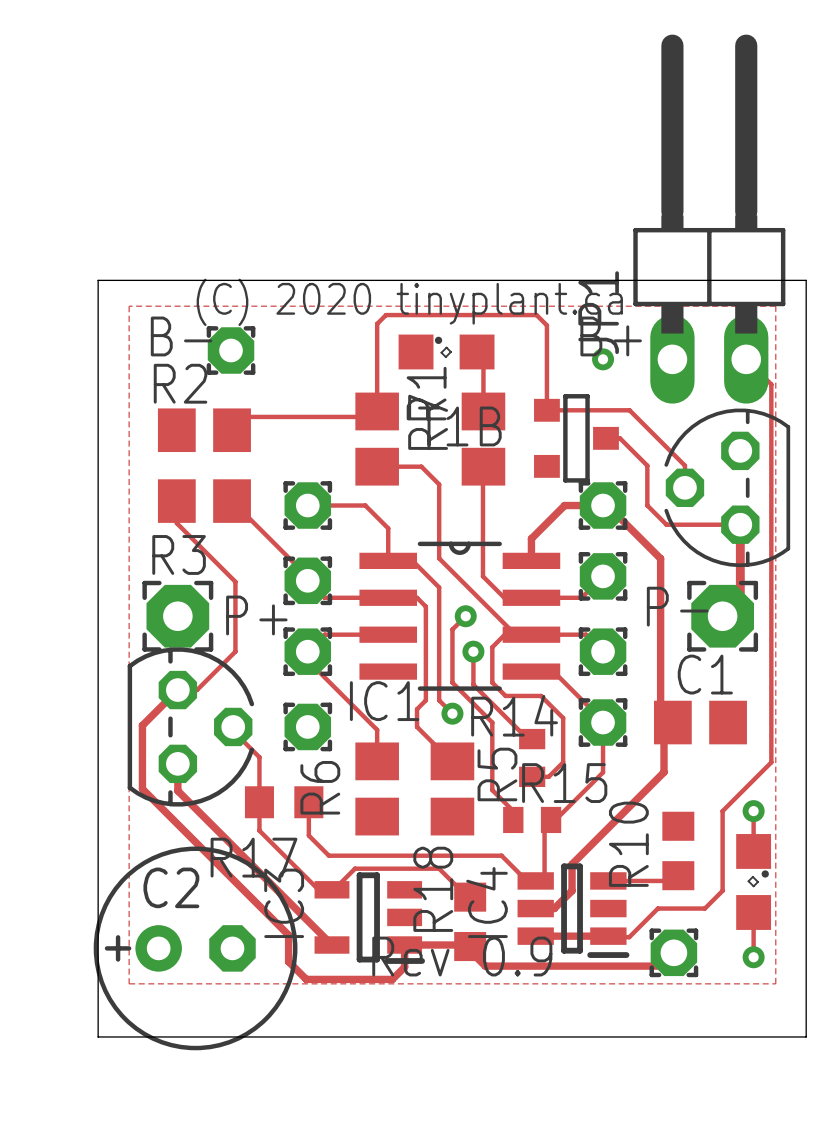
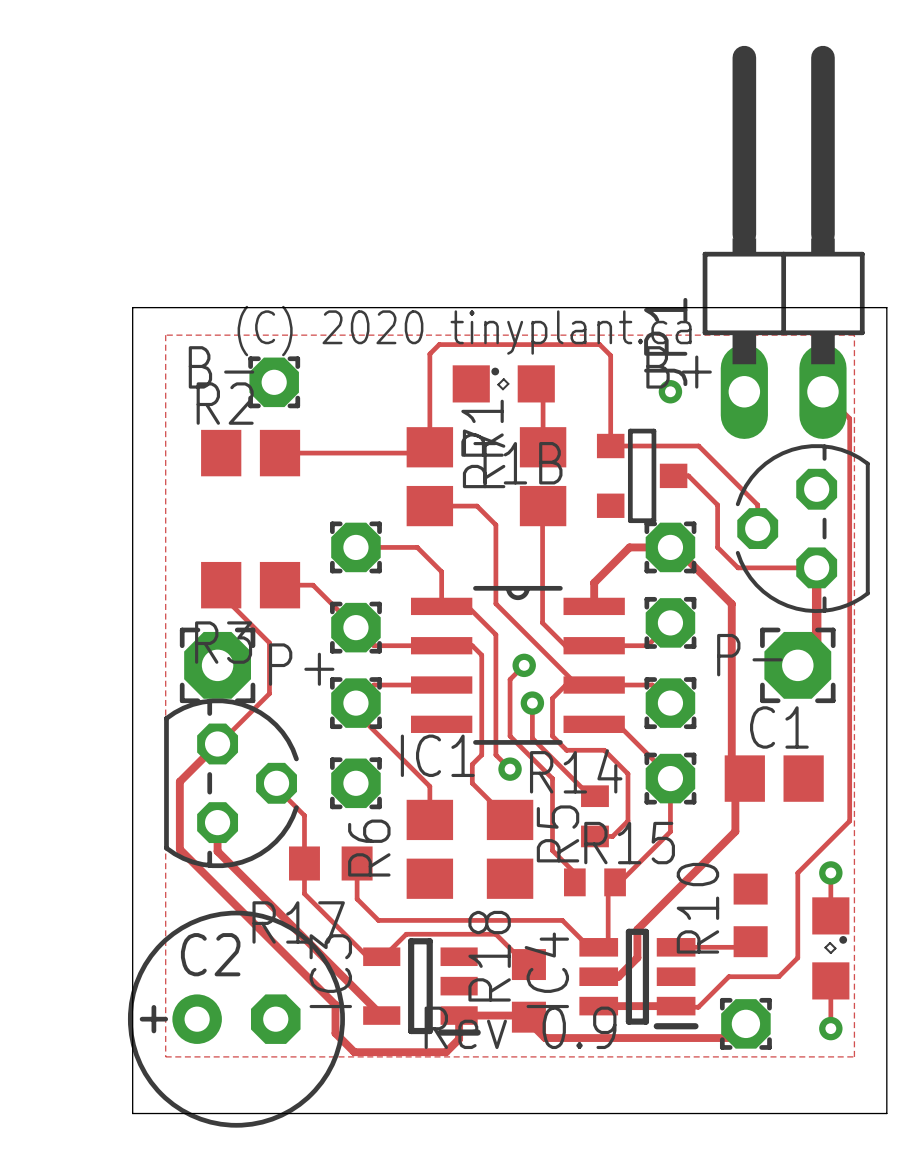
R2 position: (204, 430) -> (250, 453)
track: (176, 501) (176, 523) (235, 581) (235, 651) (197, 690) (179, 690) -> (221, 585) (230, 594) (230, 604) (269, 642) (269, 693) (219, 743)
R3 position: (204, 501) -> (250, 585)
track: (232, 501) (307, 576) (307, 580) -> (280, 585) (313, 585) (355, 627)

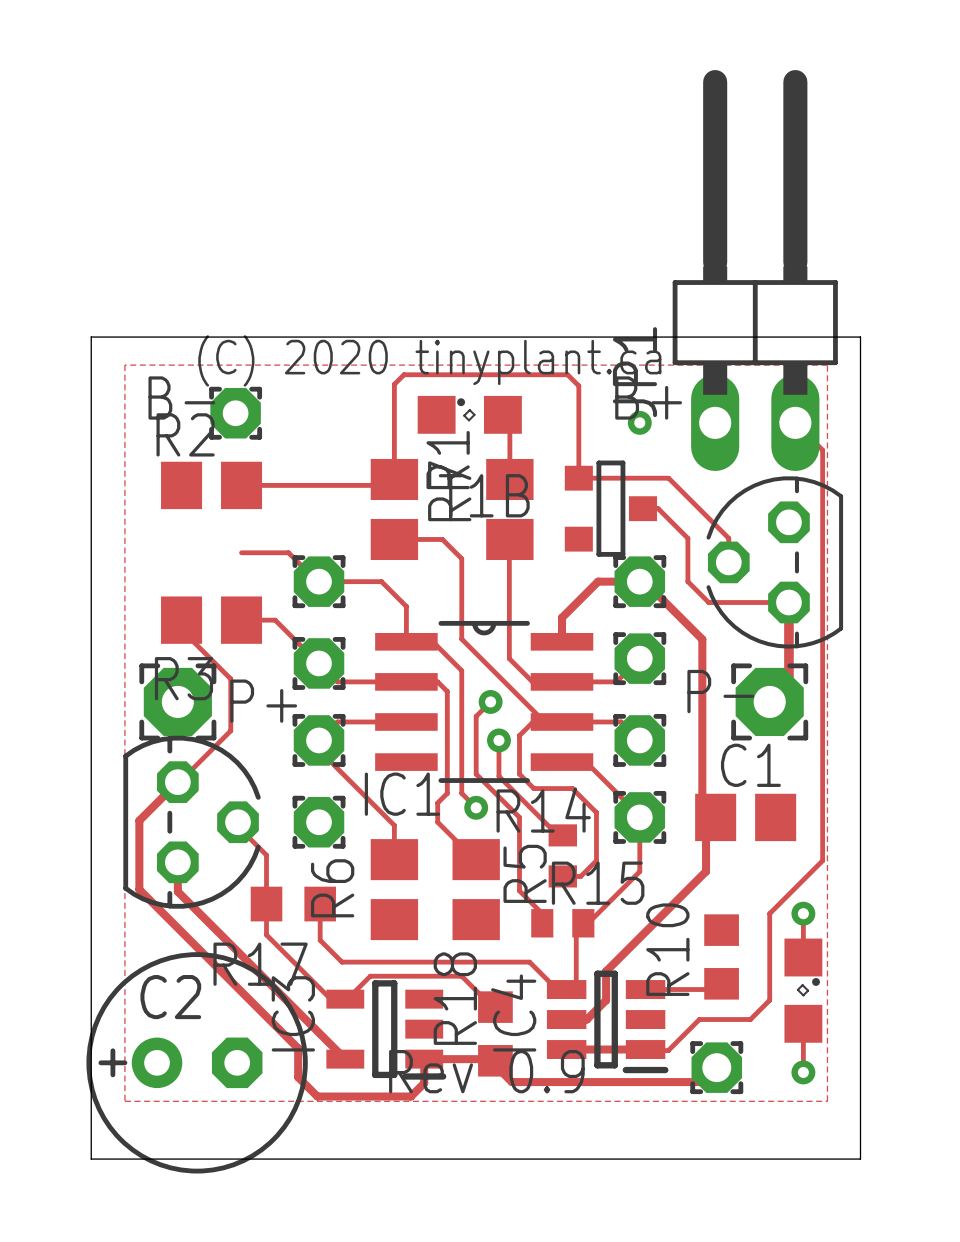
track: none -> (241, 552) (288, 552) (319, 581)

